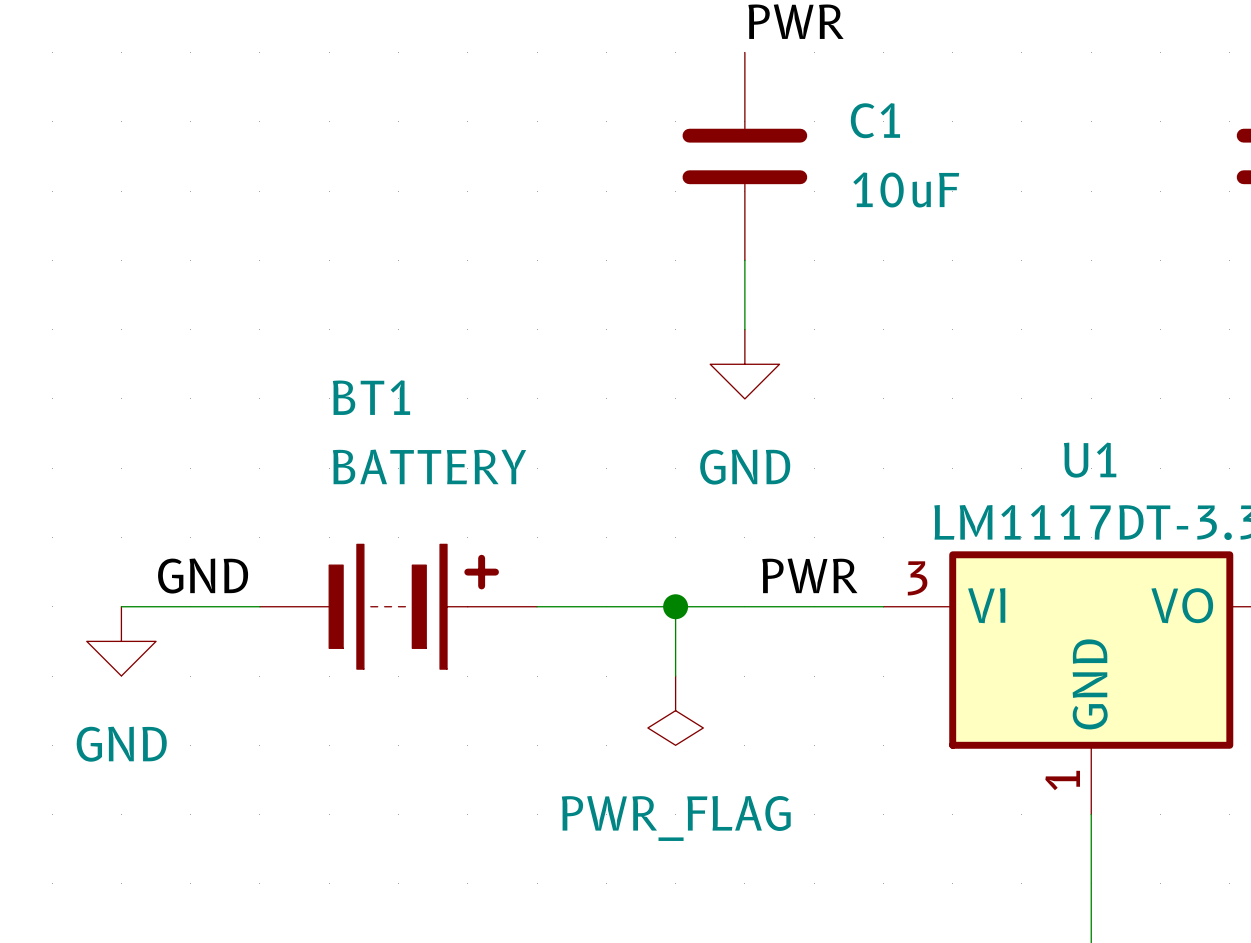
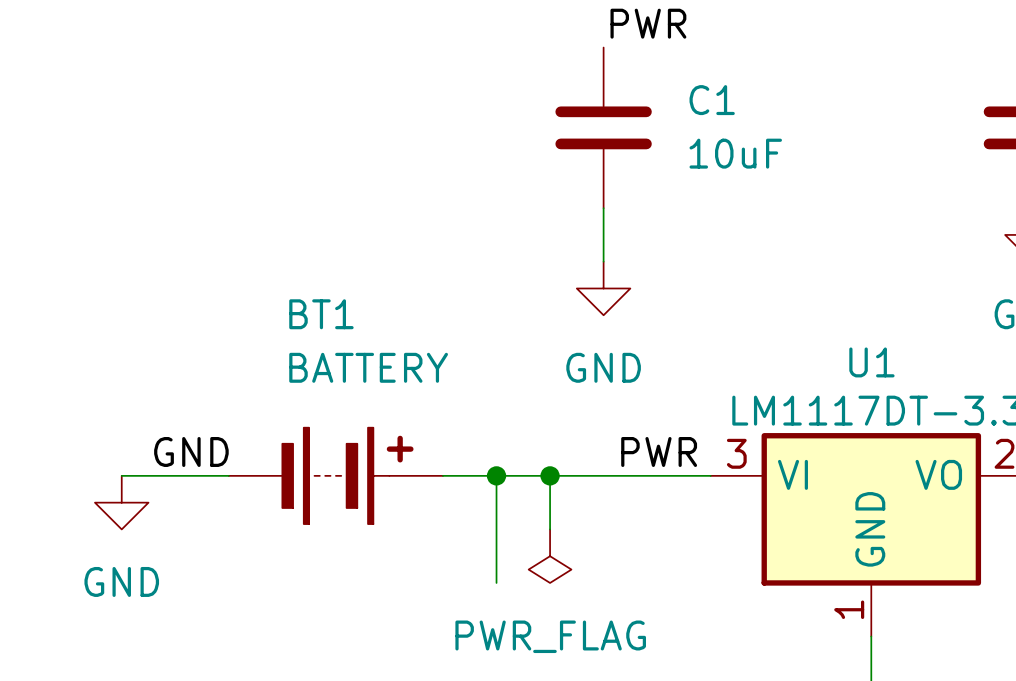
wire: none -> (496, 475) (496, 582)
junction: none -> (496, 475)

